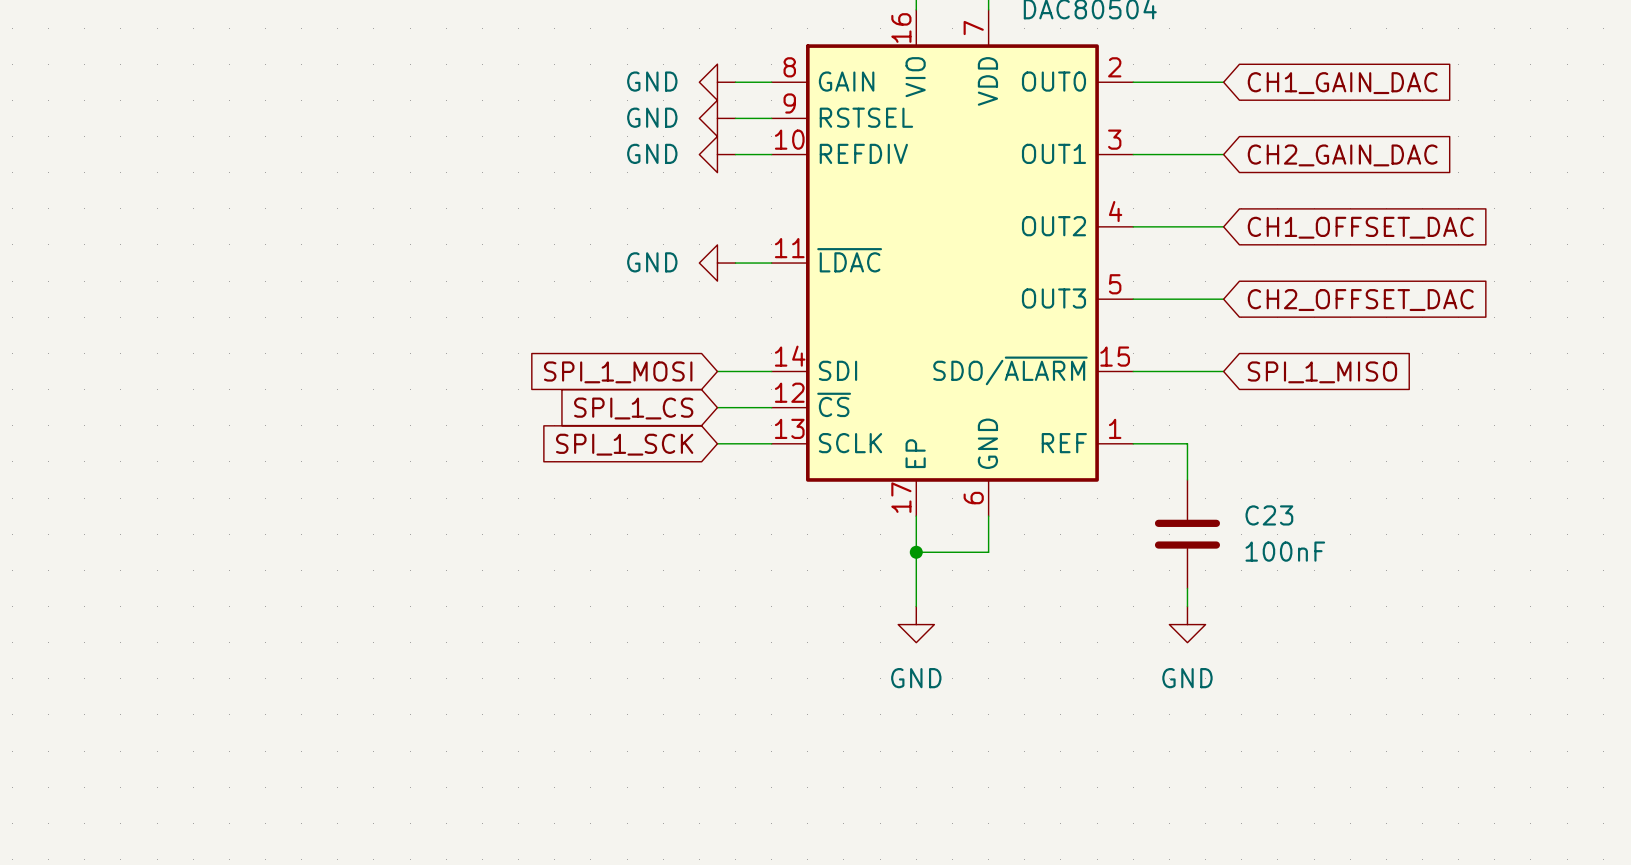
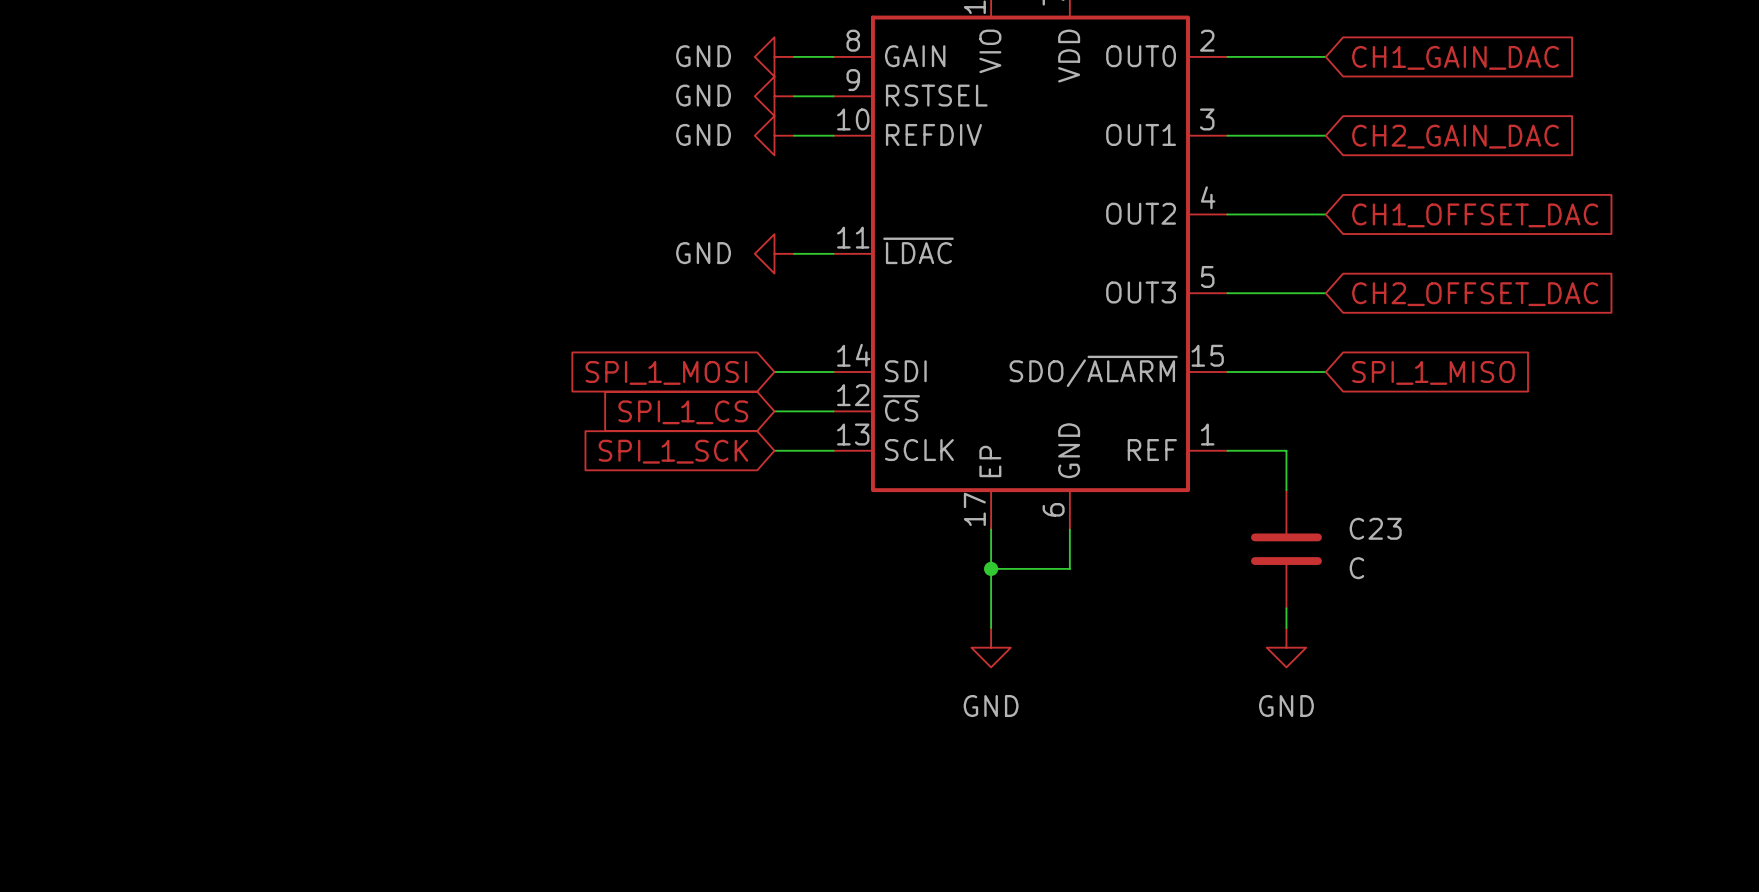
C23 value: 100nF (1285, 551) -> C (1356, 568)

